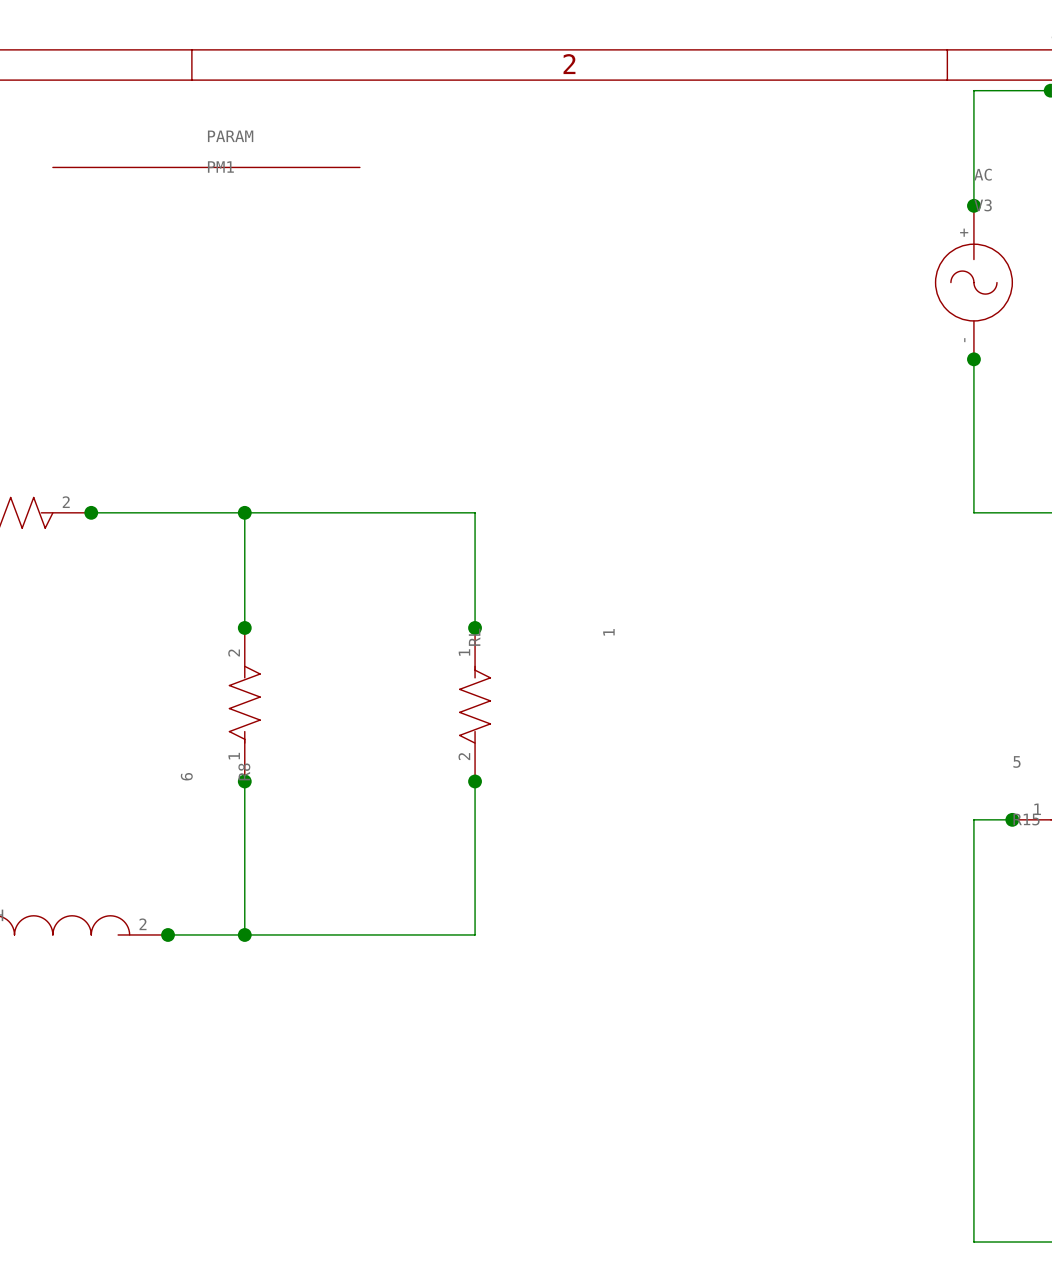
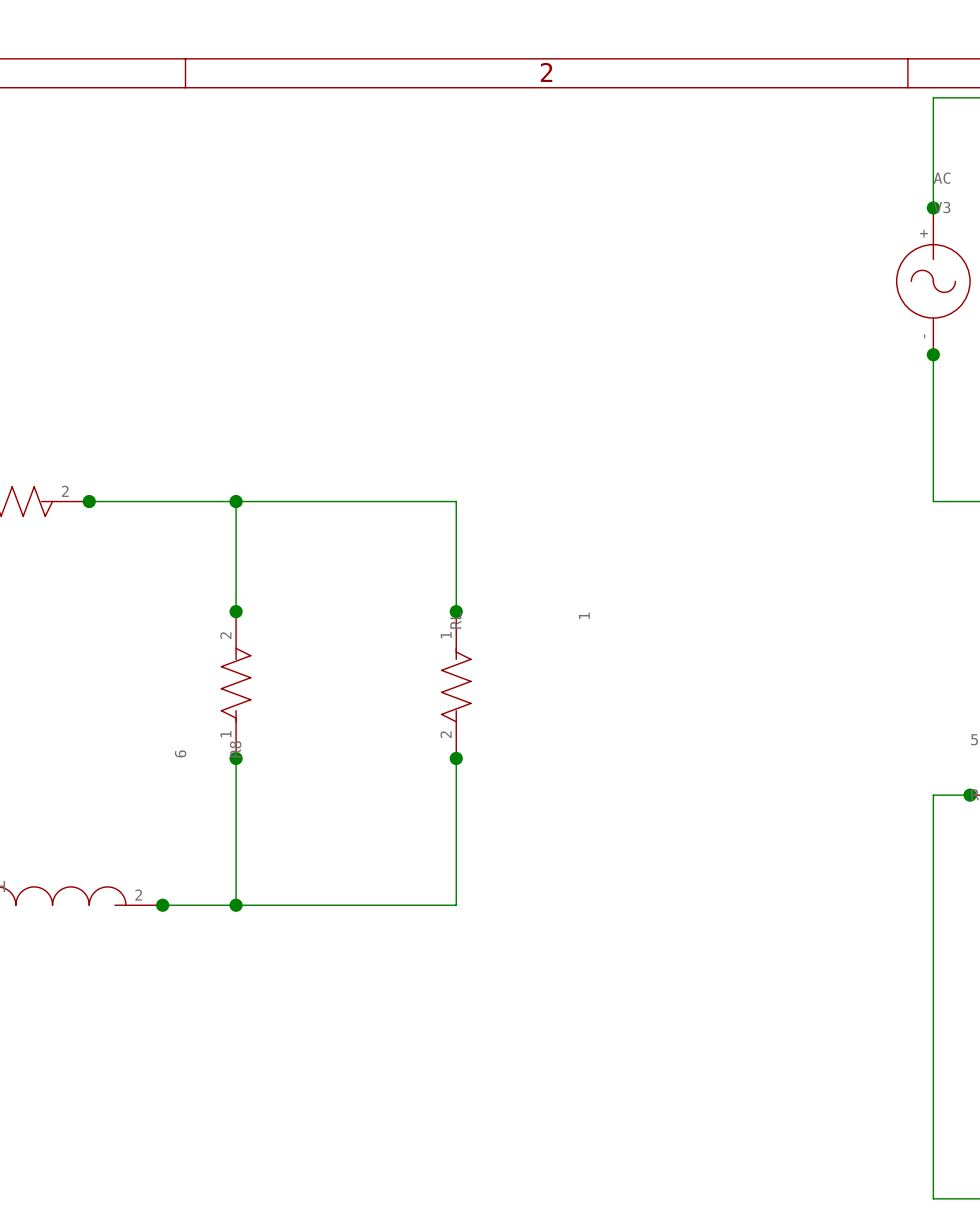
PM1: PARAM (206, 167) -> none

